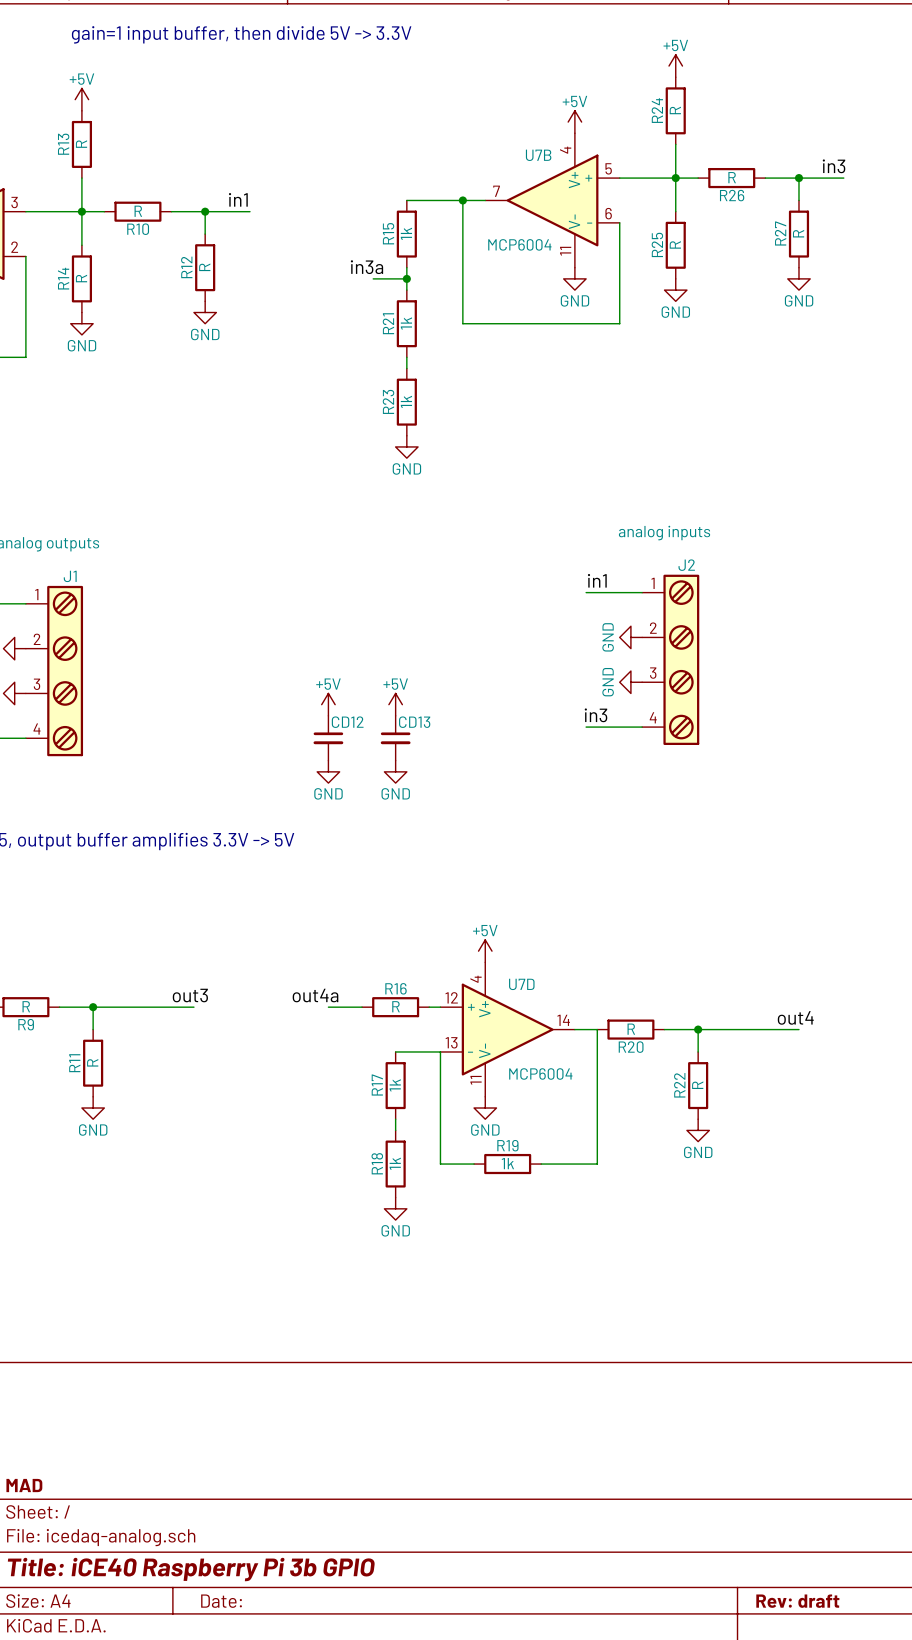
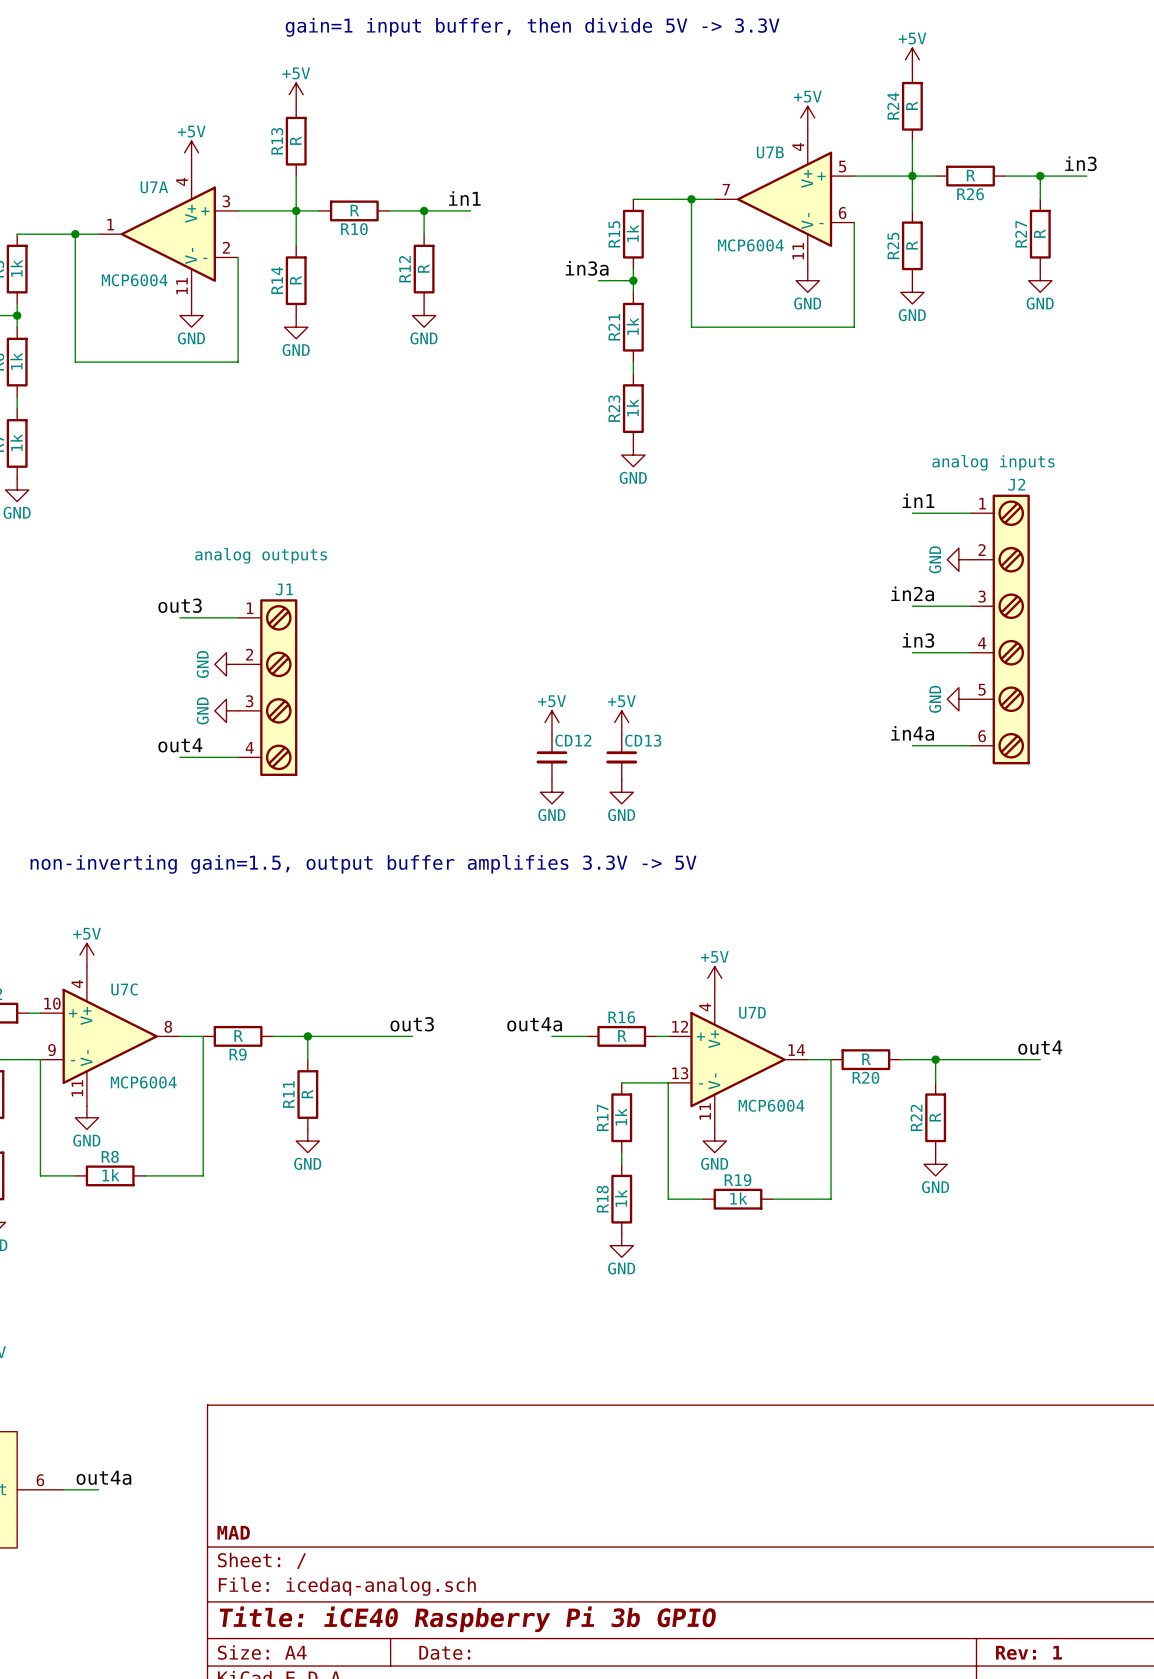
wire: none -> (912, 513) (970, 513)
J2 value position: analog inputs (664, 533) -> analog inputs (993, 462)
power symbol: none -> GND (958, 559)
J2 name position: J2 (686, 565) -> J2 (1016, 484)
J2 symbol: [642, 574, 700, 745] -> [970, 494, 1030, 765]
label position: in1 (597, 580) -> in1 (918, 500)
label: none -> in2a (912, 593)
wire: (586, 592) (642, 592) -> (912, 606) (970, 606)
power symbol: GND (630, 637) -> none
wire: none -> (912, 652) (970, 652)
power symbol: GND (630, 682) -> none
power symbol: none -> GND (958, 699)
label position: in3 (596, 715) -> in3 (918, 640)
label: none -> in4a (912, 733)
wire: (586, 727) (642, 727) -> (912, 745) (970, 745)
title block: Rev: draft (797, 1601) -> Rev: 1 (1028, 1652)

